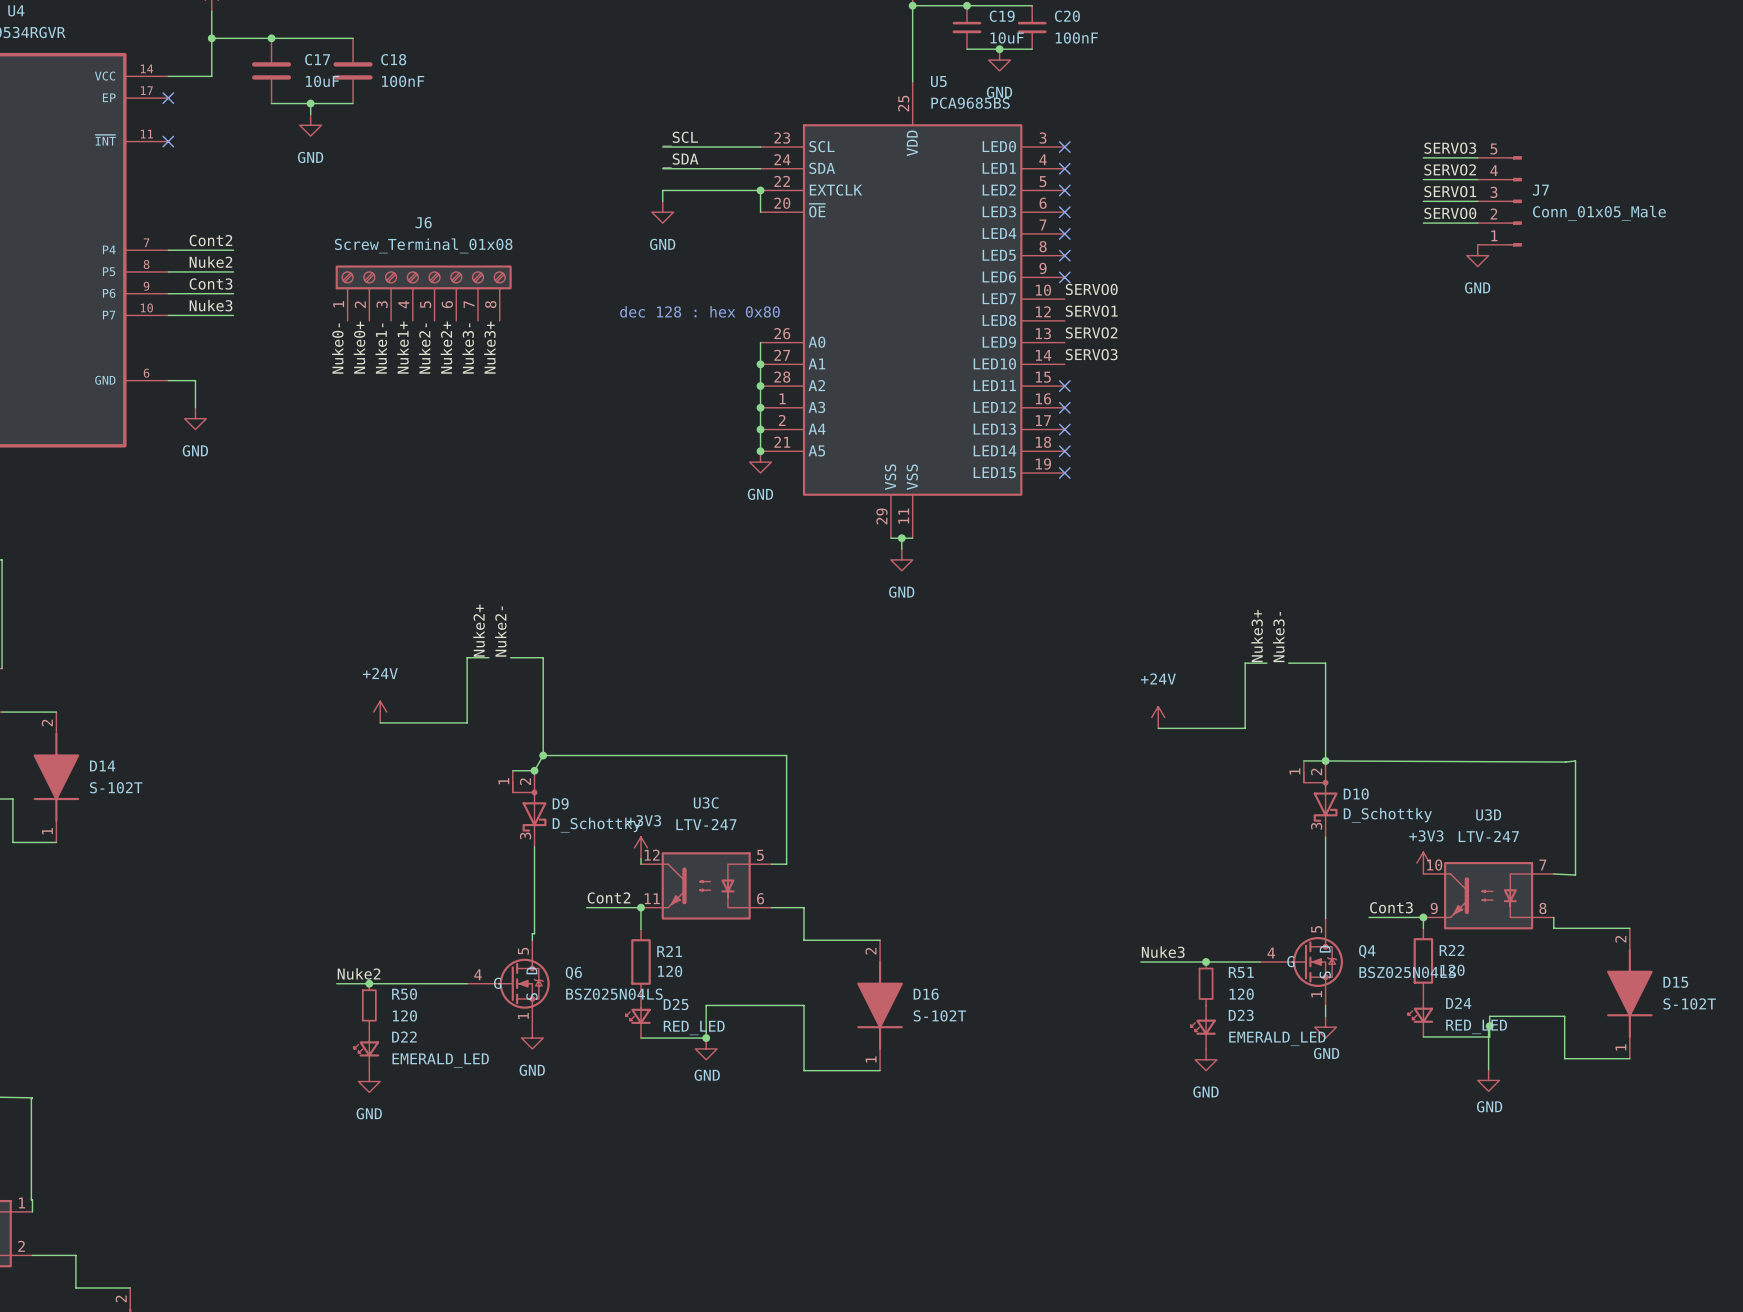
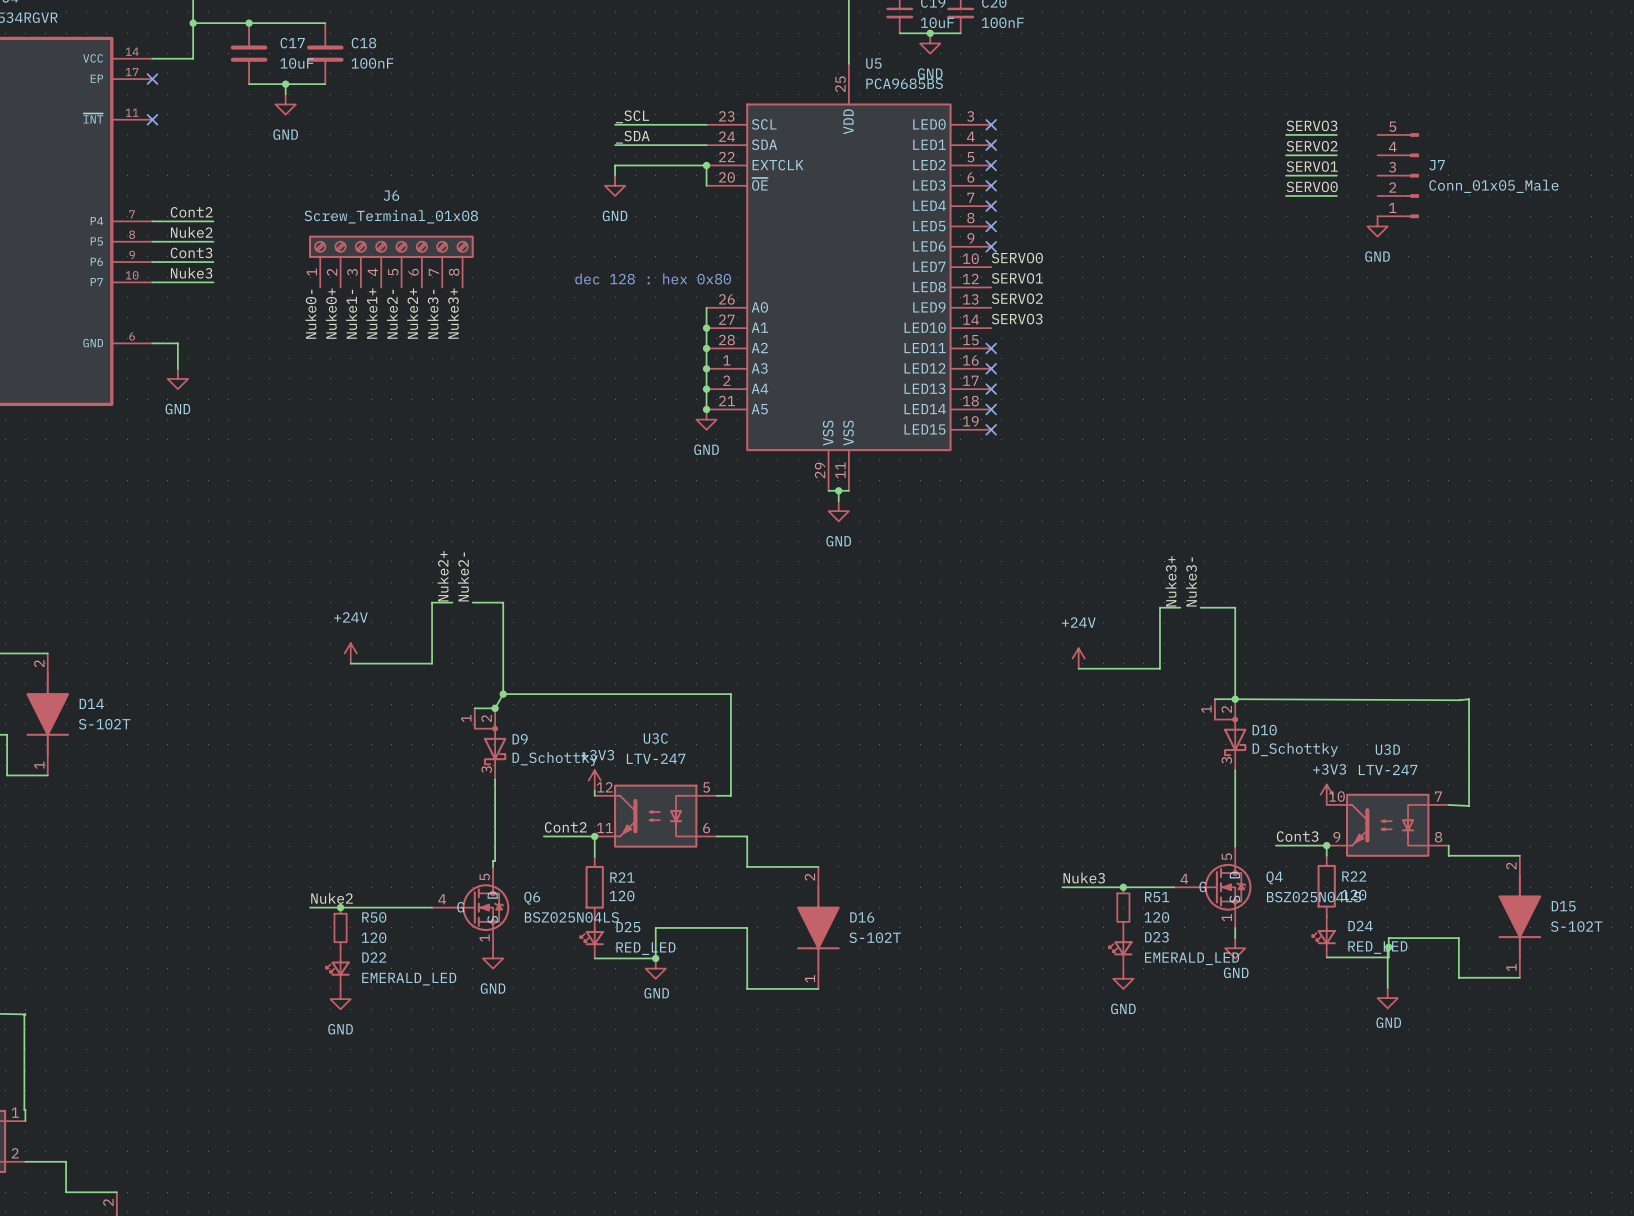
label position: SERVO3 (1450, 148) -> SERVO3 (1311, 125)
wire: (1434, 157) (1477, 157) -> (1286, 134) (1326, 134)
label position: SERVO2 (1450, 169) -> SERVO2 (1312, 146)
wire: (1434, 179) (1477, 179) -> (1286, 155) (1326, 155)
label position: SERVO1 (1450, 191) -> SERVO1 (1312, 166)
wire: (1434, 201) (1477, 201) -> (1286, 175) (1326, 175)
label position: SERVO0 (1450, 213) -> SERVO0 (1312, 186)
wire: (1434, 223) (1477, 223) -> (1286, 195) (1326, 195)

